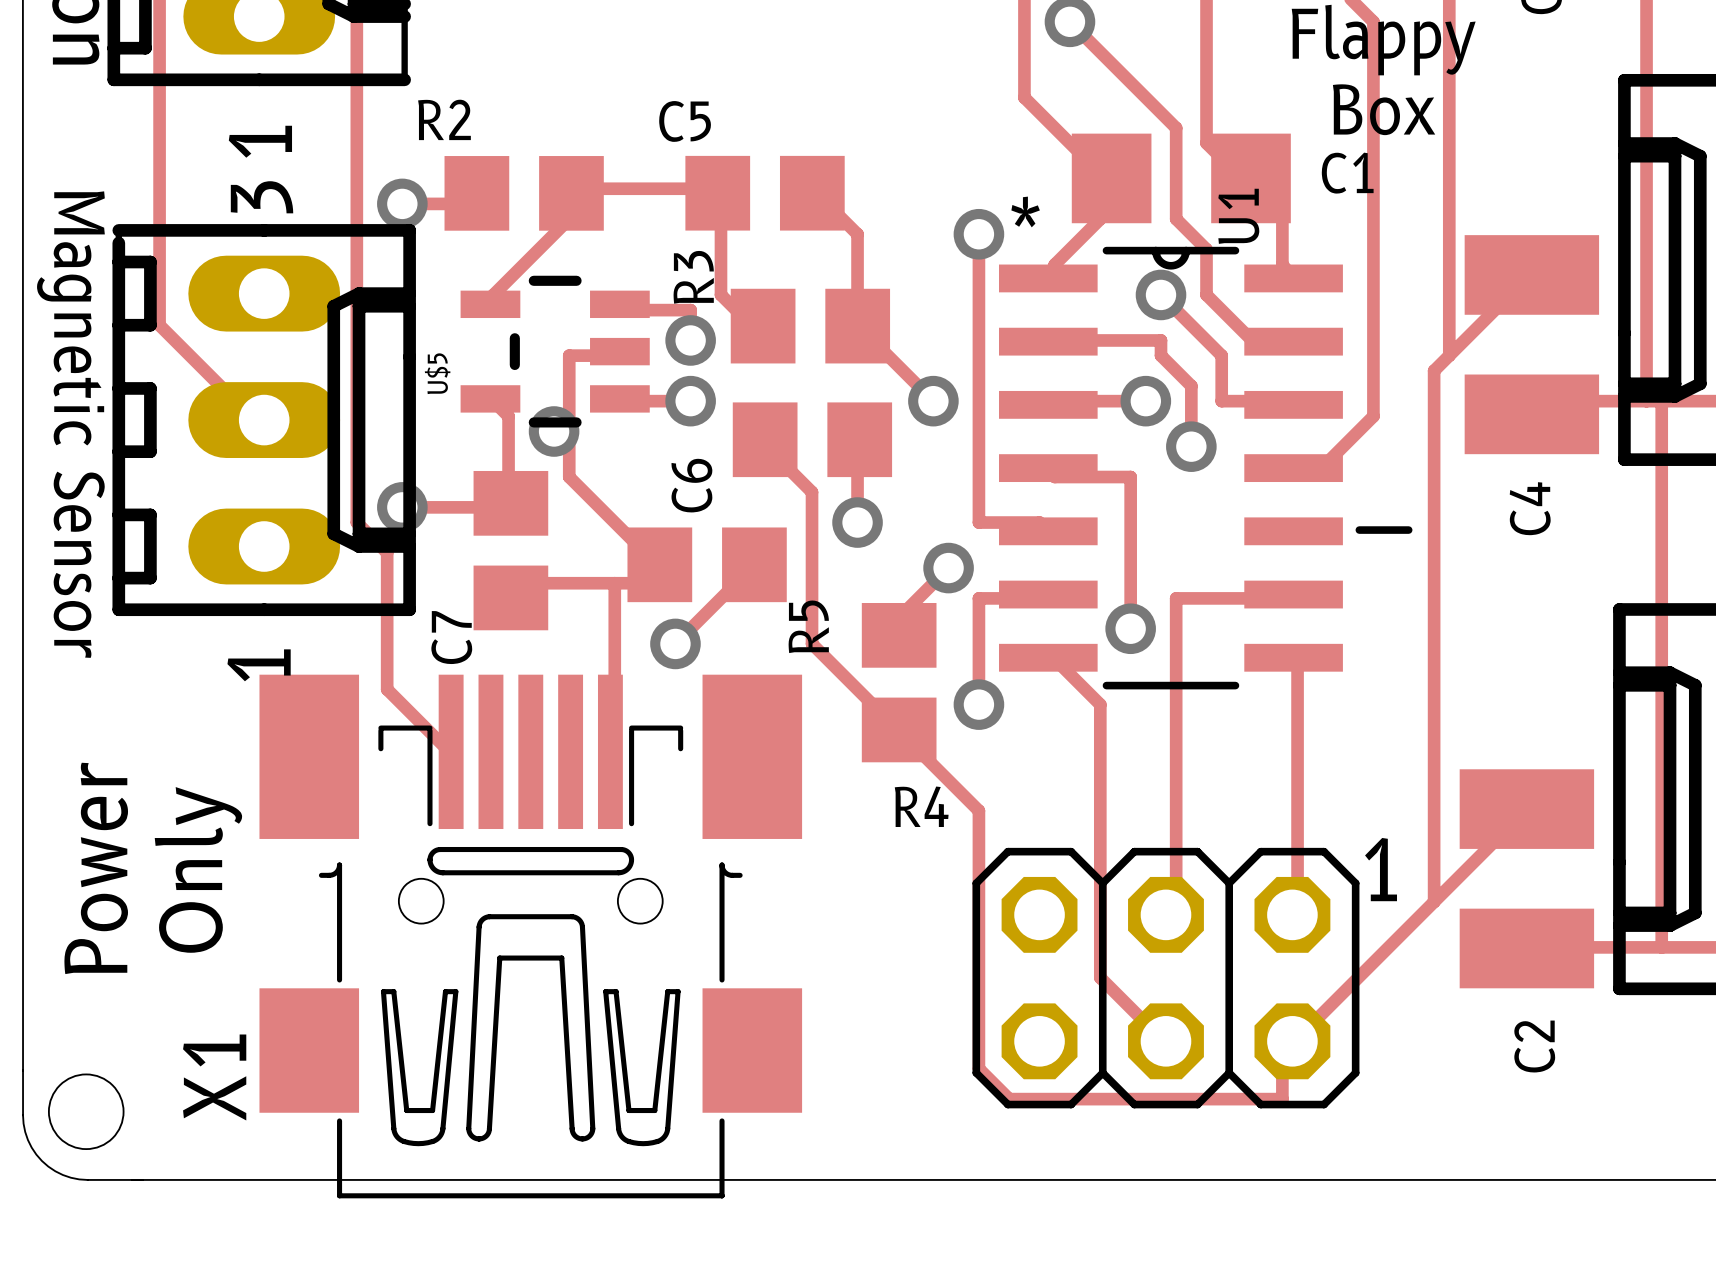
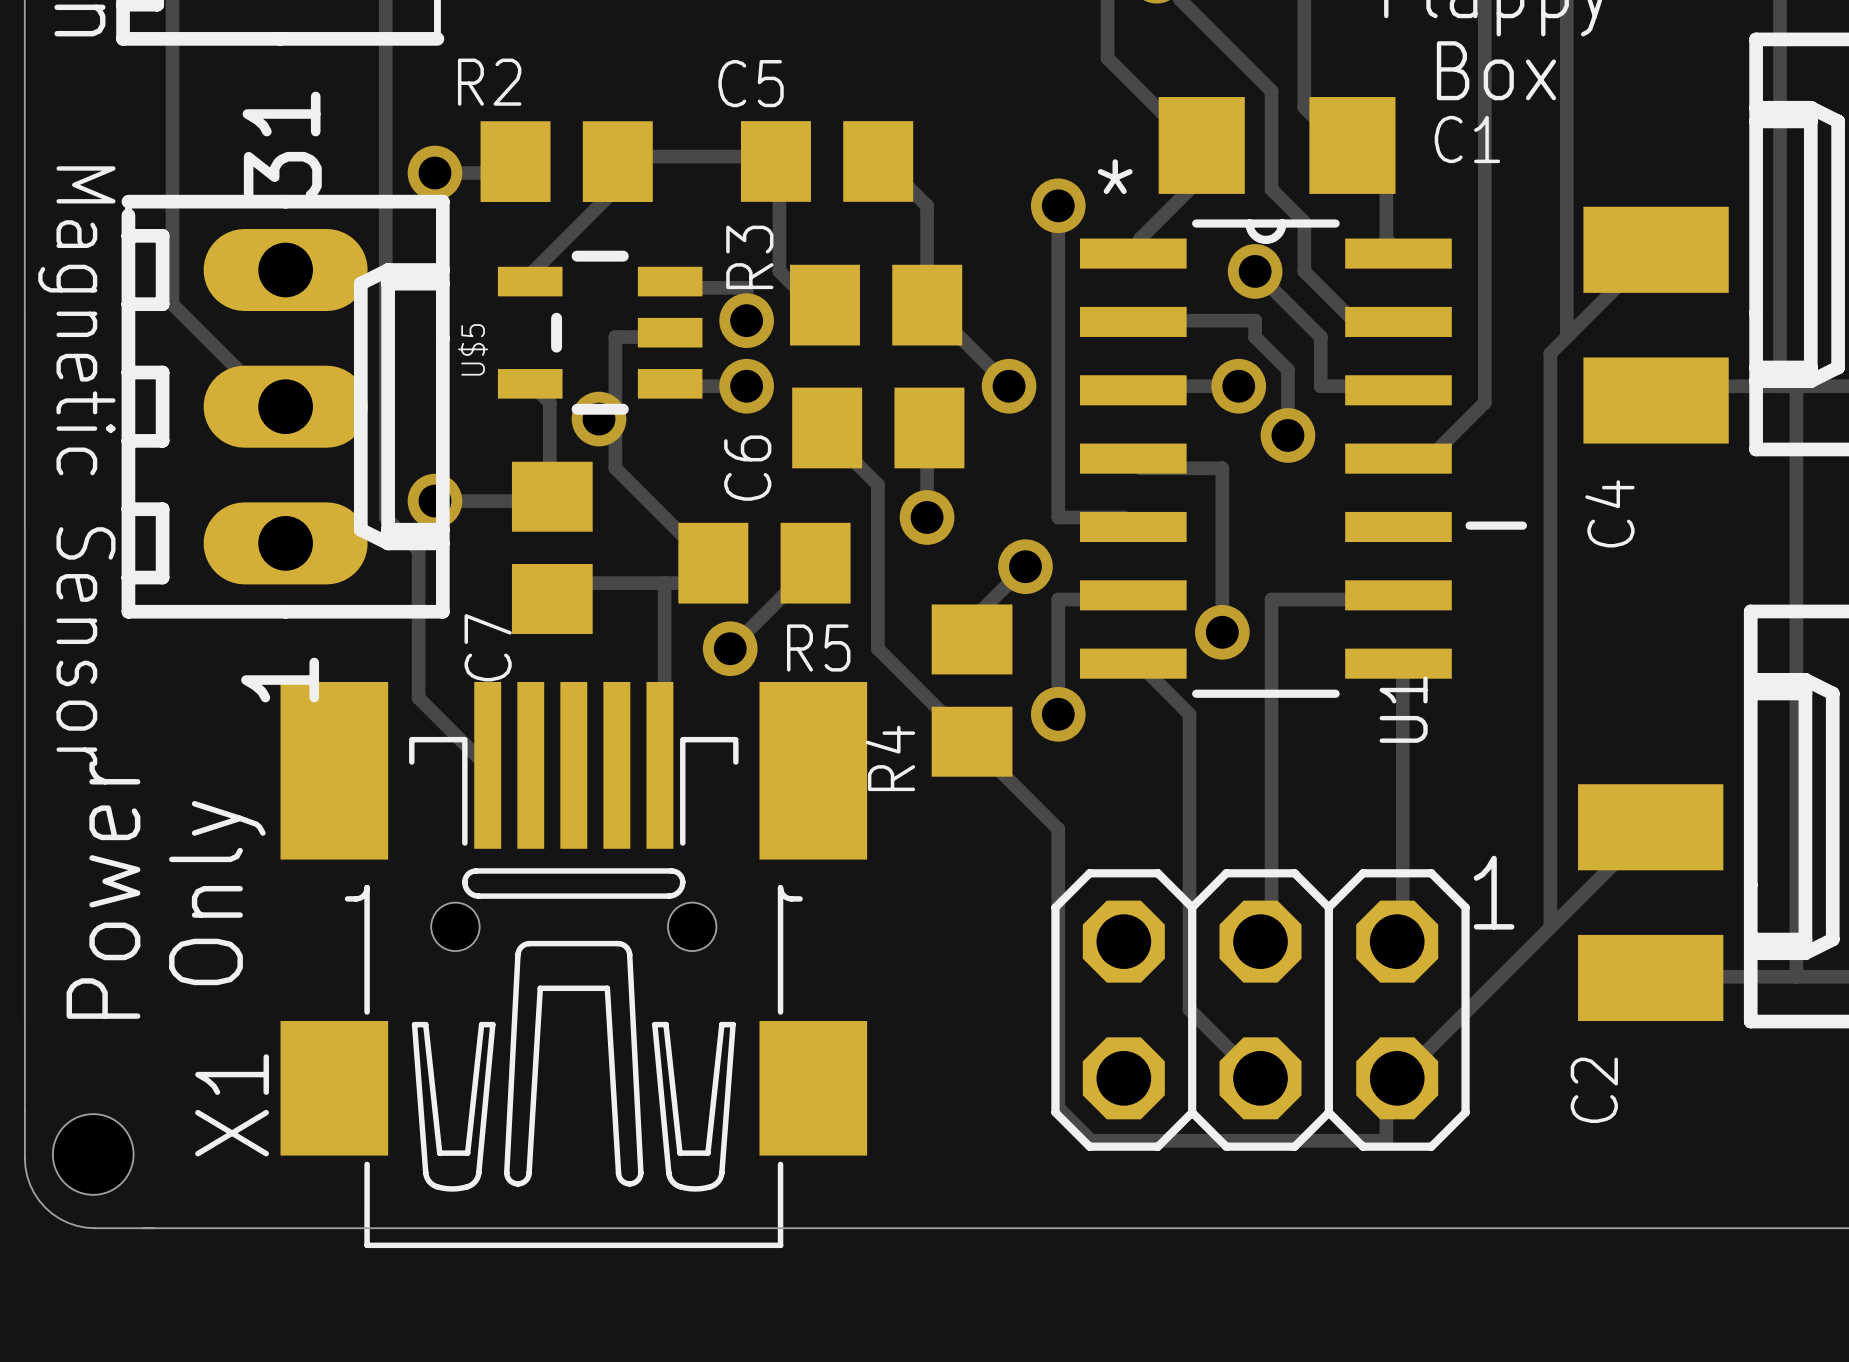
U1 name position: U1 (1238, 216) -> U1 (1403, 709)
C4 name position: C4 (1530, 508) -> C4 (1609, 513)
R5 name rotation: 0° (808, 626) -> 90° clockwise (818, 647)
R4 name rotation: 0° (921, 806) -> 90° counterclockwise (890, 758)
R4 name position: R4 (921, 806) -> R4 (890, 758)
C2 name position: C2 (1534, 1046) -> C2 (1594, 1090)

